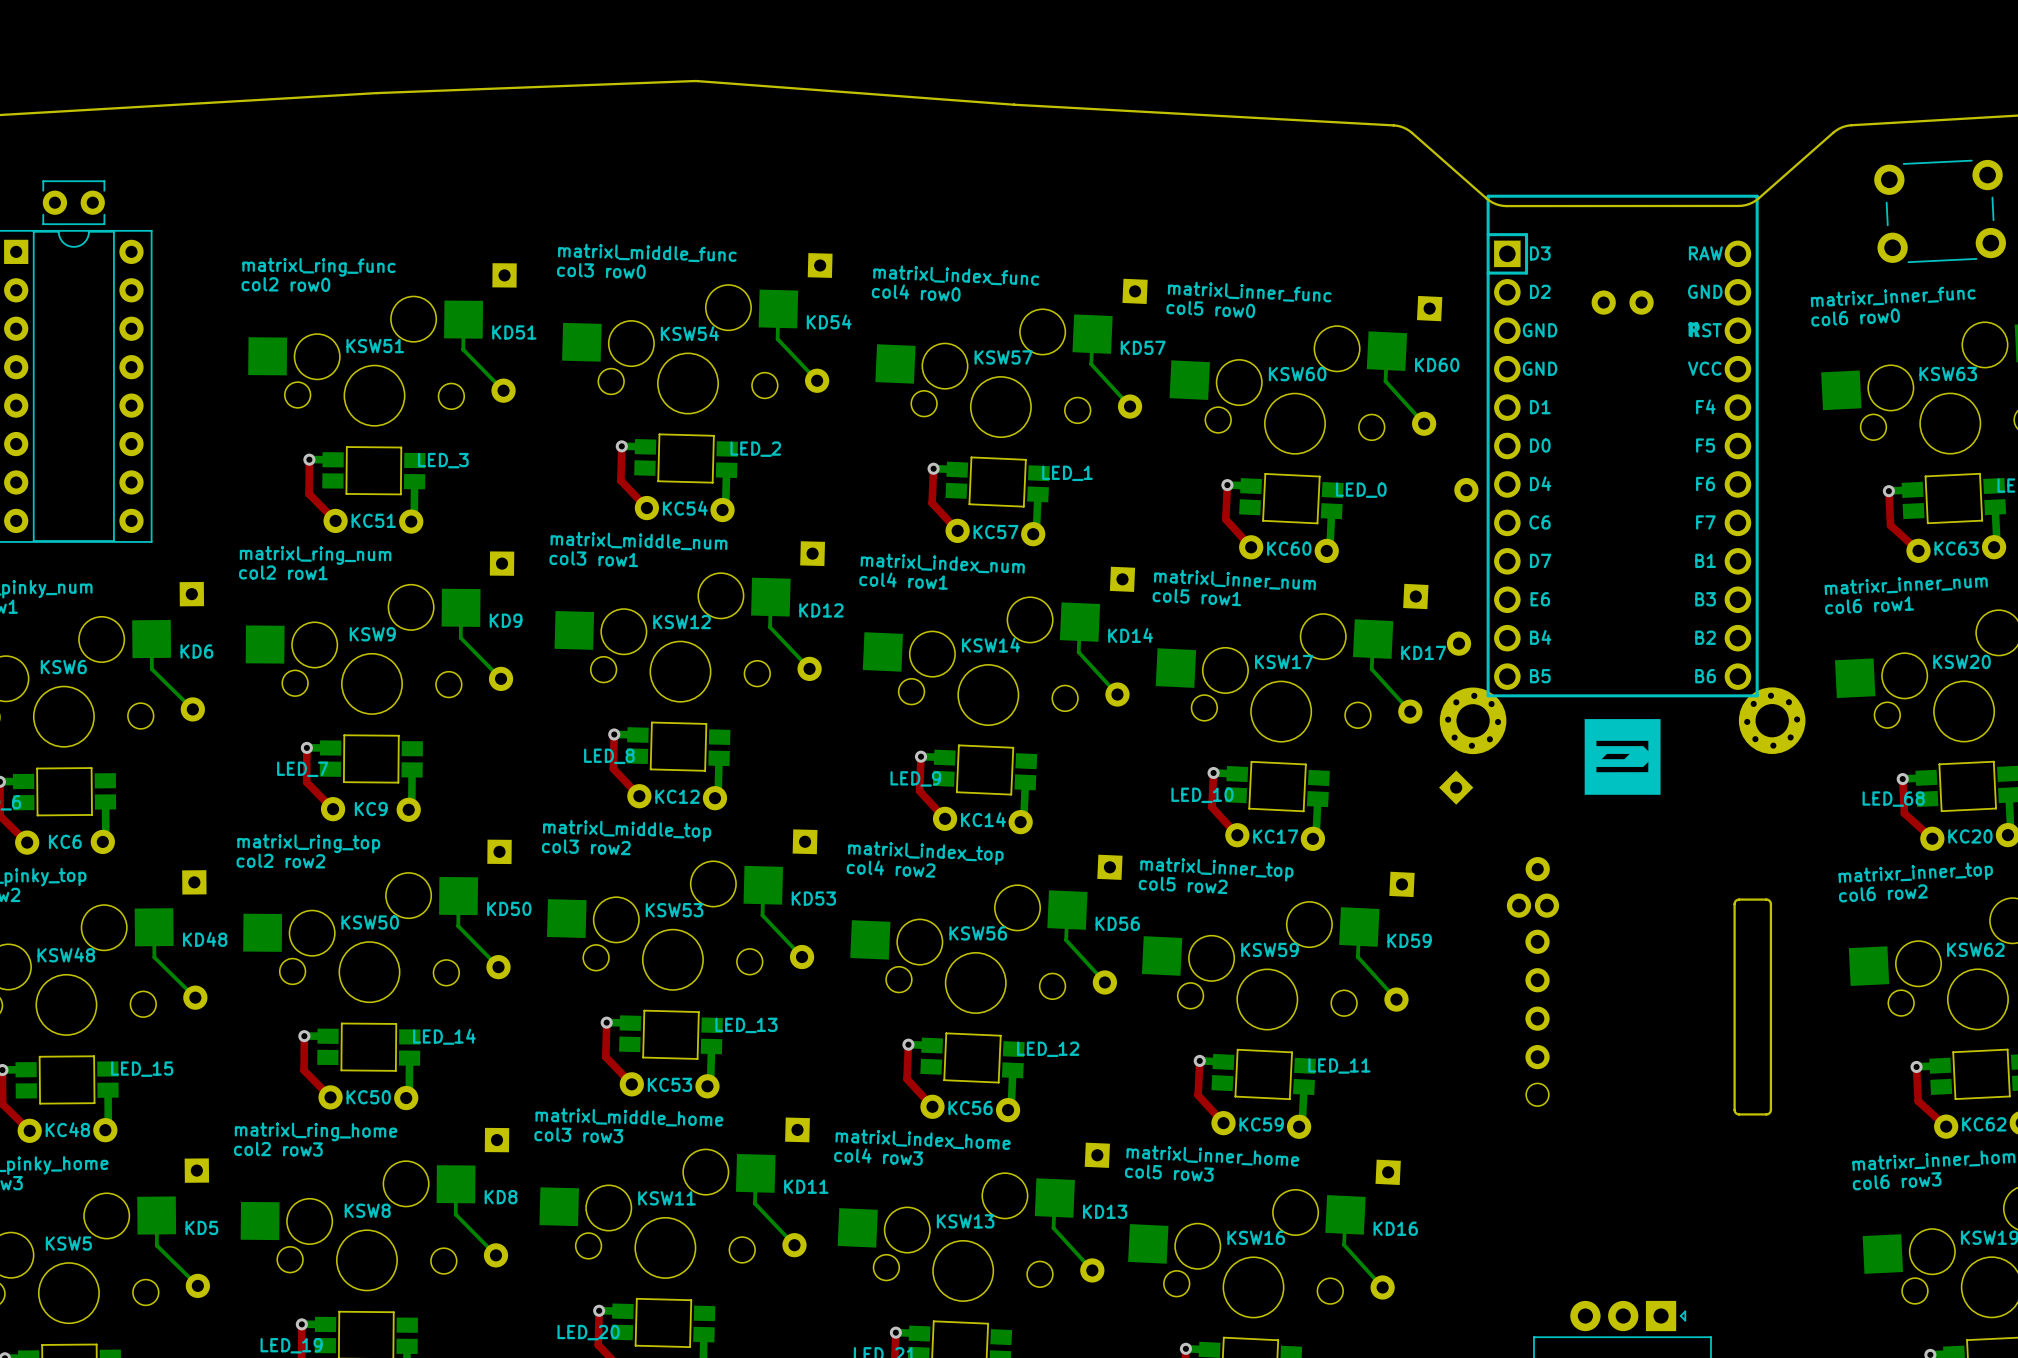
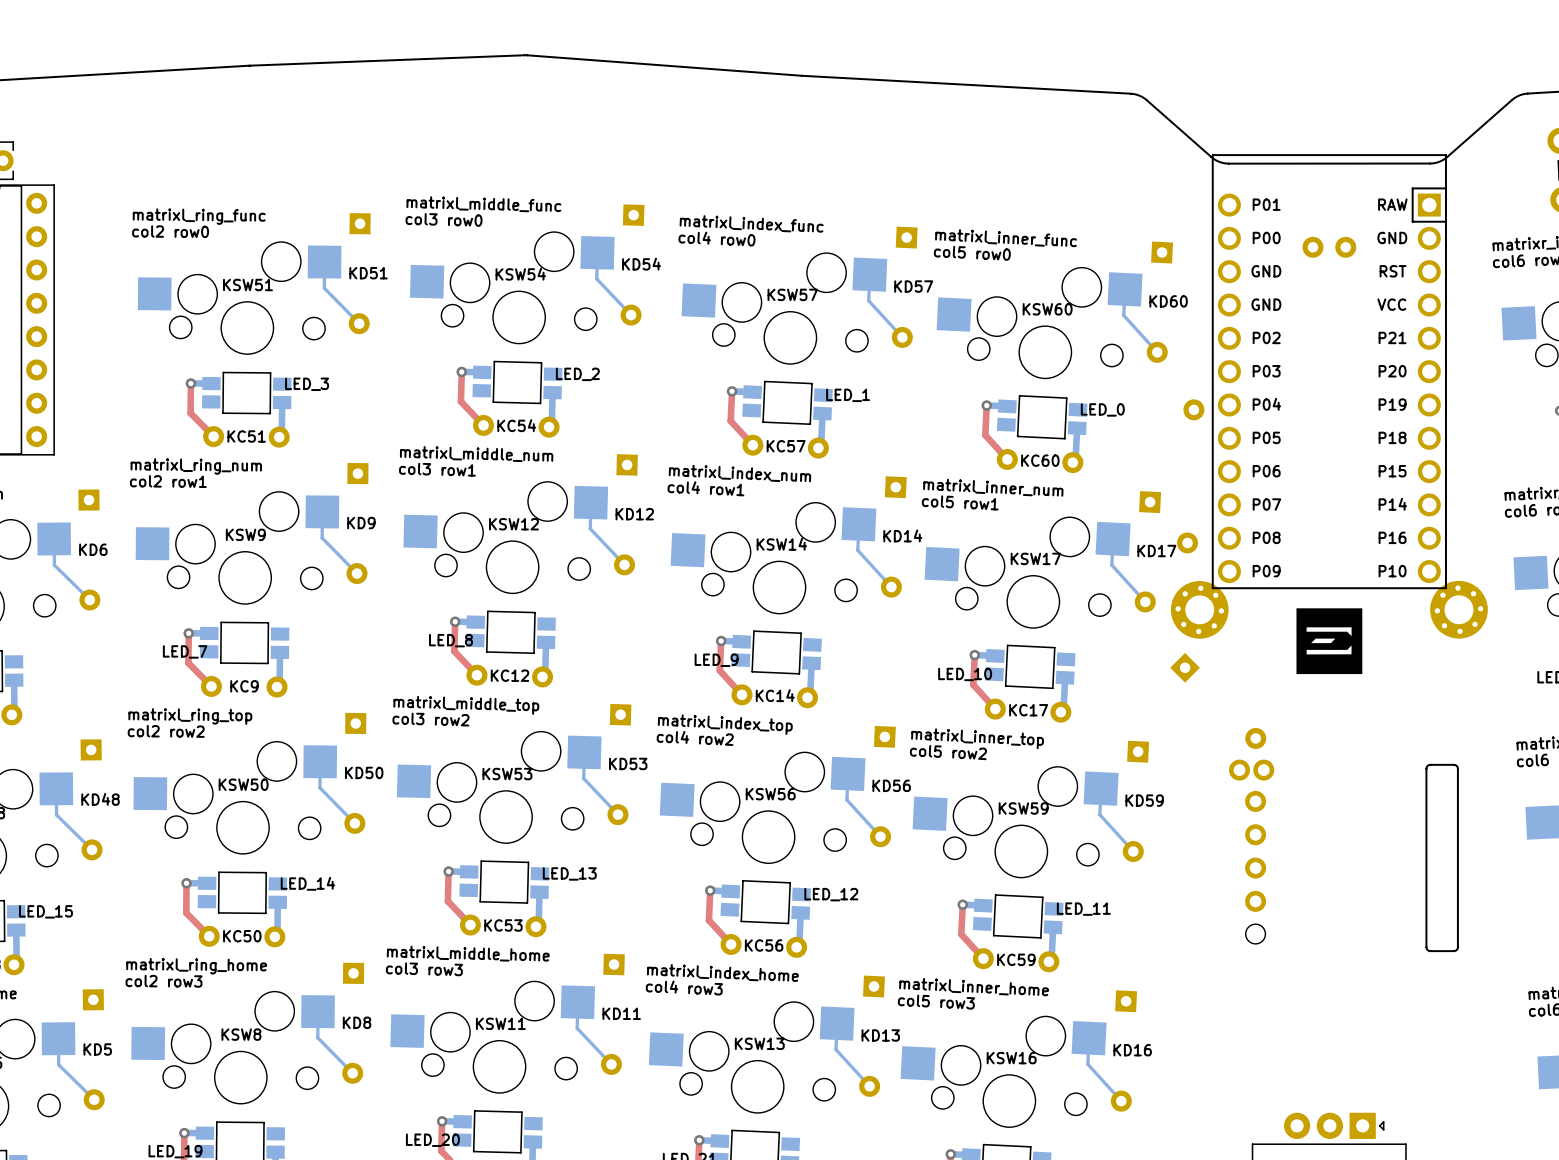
part footprint: [1486, 194, 1759, 698] -> [1211, 154, 1447, 590]

